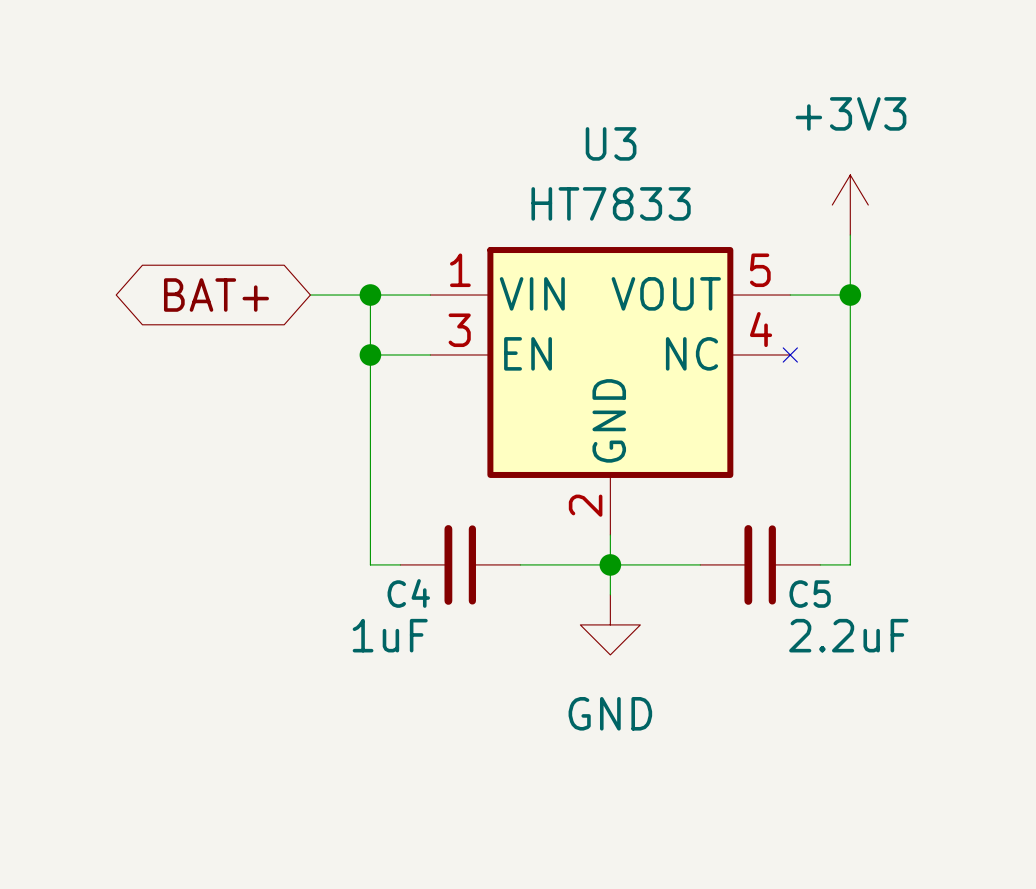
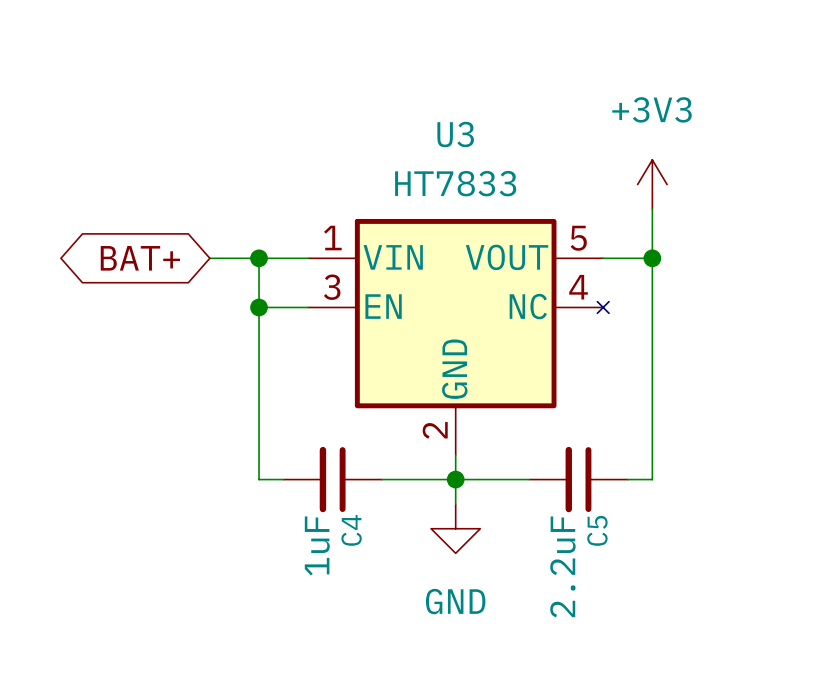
C4 name rotation: 0° (408, 593) -> 90° counterclockwise (351, 530)
C4 name position: C4 (408, 593) -> C4 (351, 530)
C5 name rotation: 0° (810, 594) -> 90° counterclockwise (597, 530)
C4 value rotation: 0° (390, 635) -> 90° counterclockwise (317, 545)
C5 value rotation: 0° (848, 635) -> 90° counterclockwise (562, 566)

